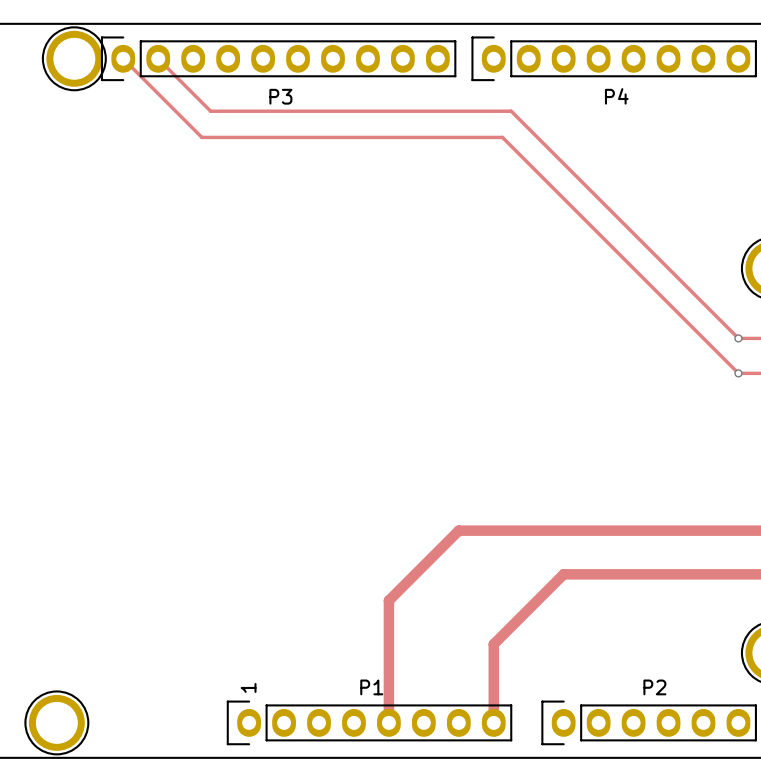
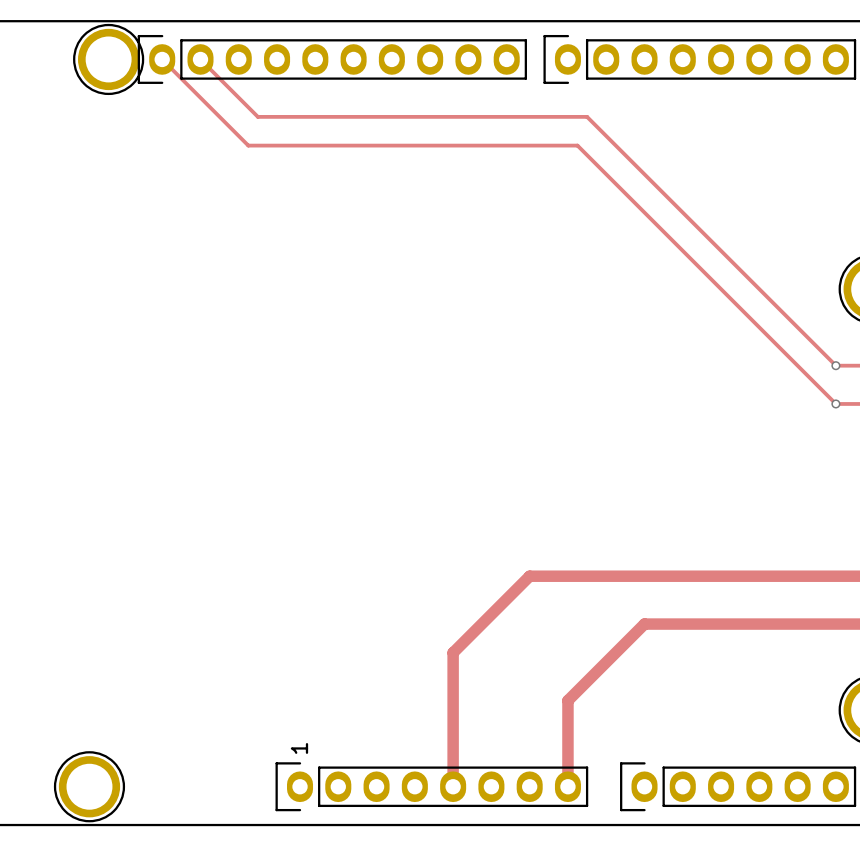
P3 name: P3 (280, 96) -> none
P4 name: P4 (616, 96) -> none
P1 name: P1 (371, 687) -> none
P2 name: P2 (654, 687) -> none

